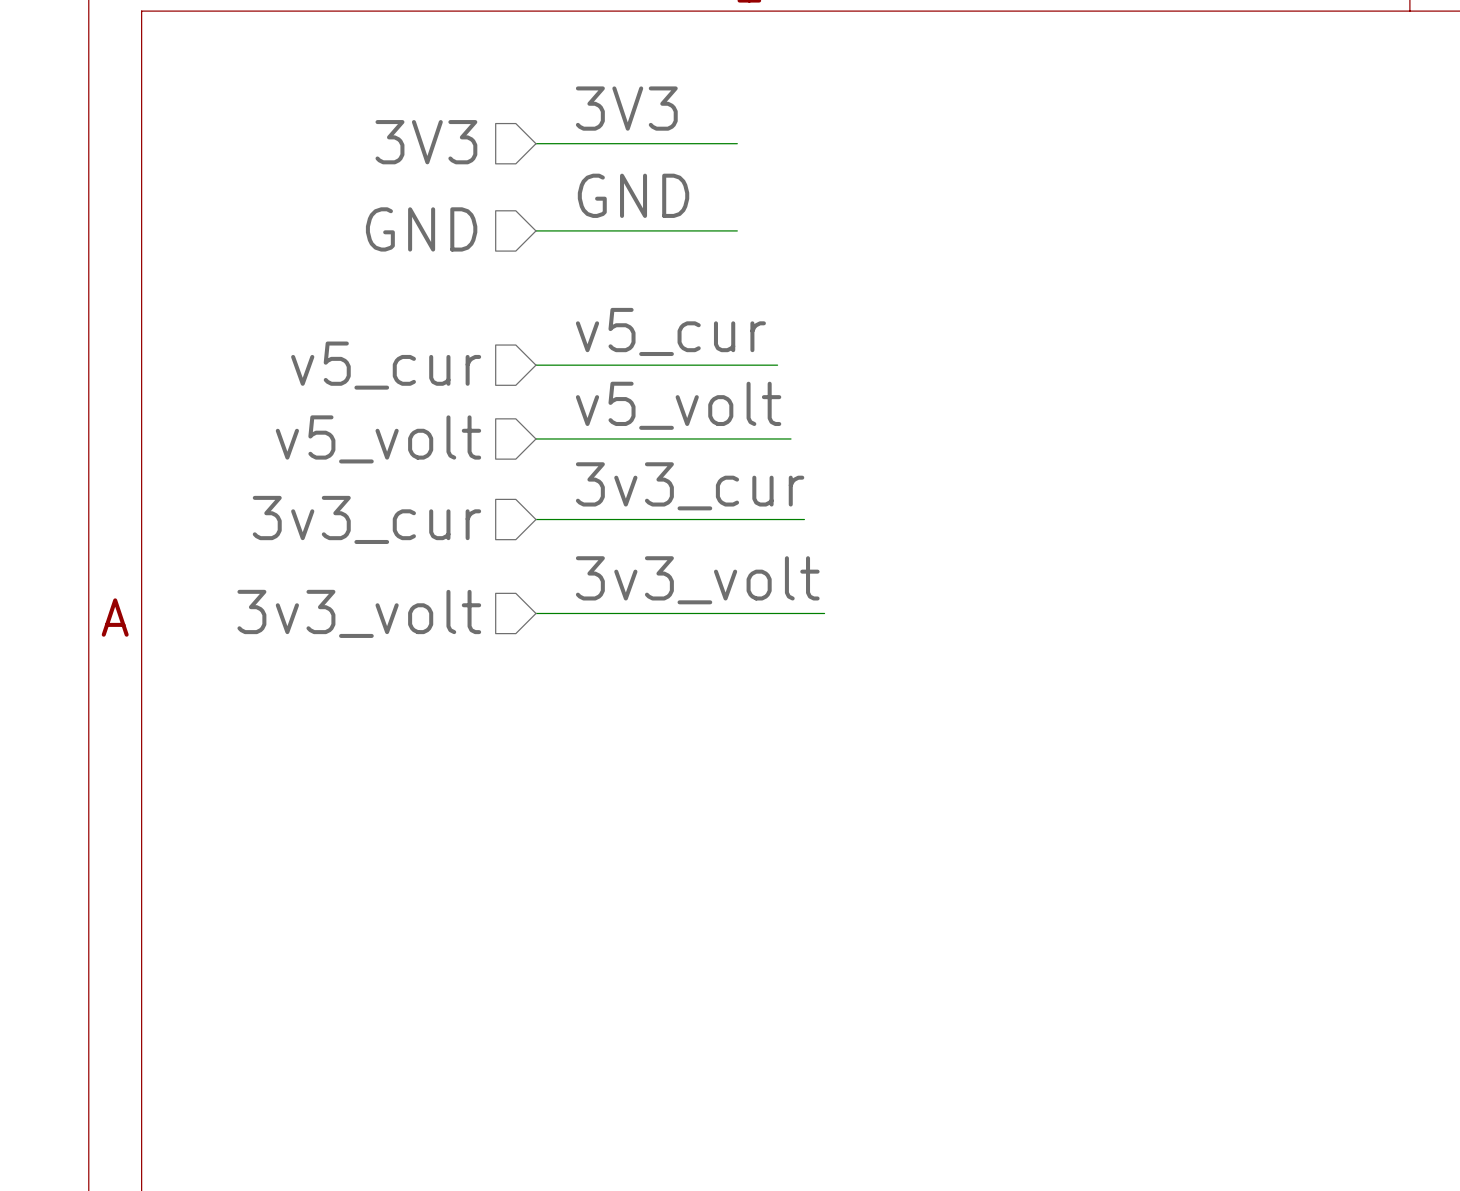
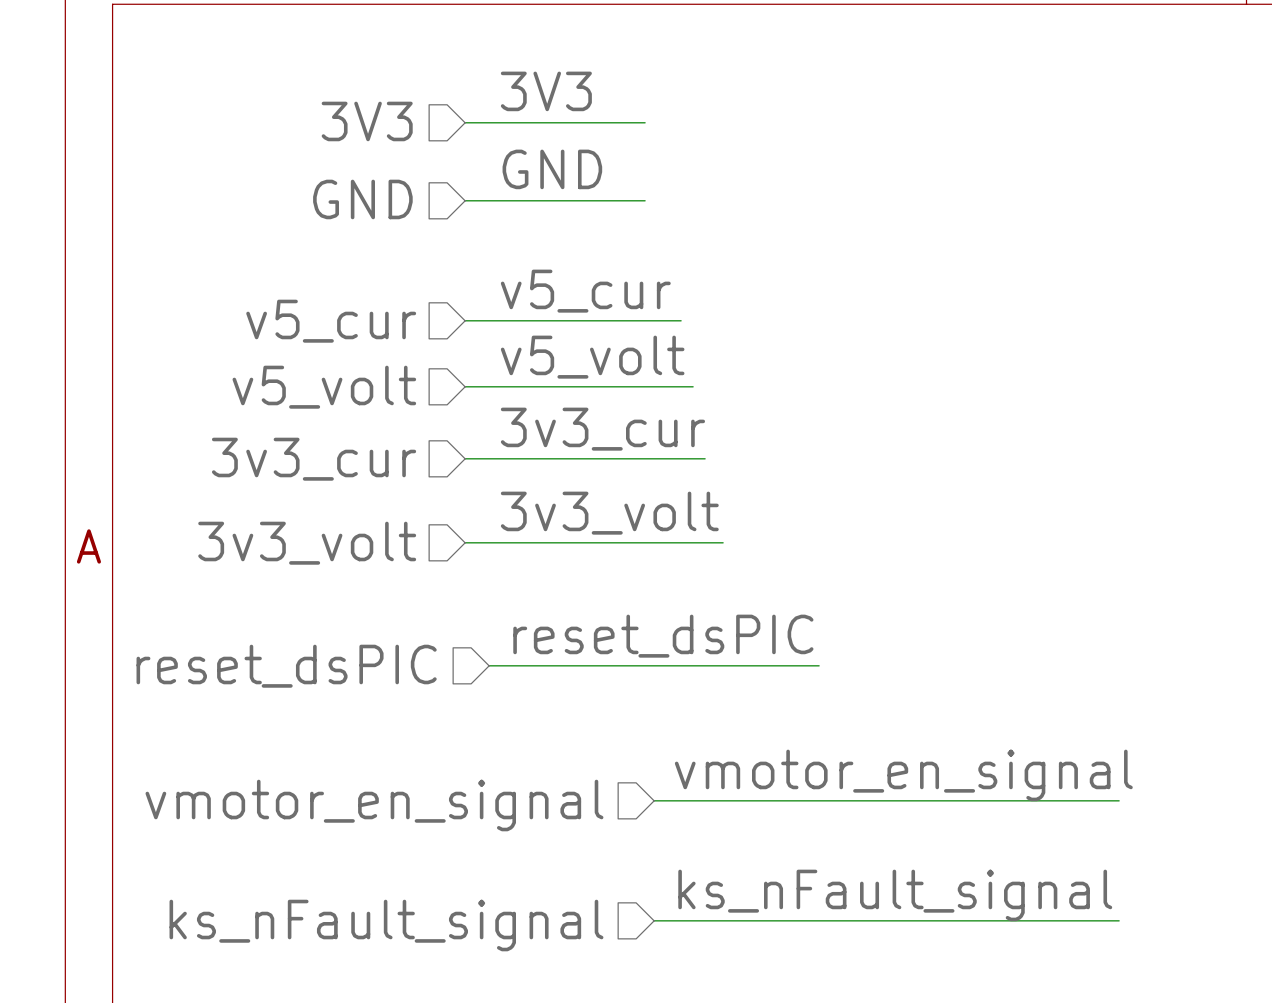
label: none -> reset_dsPIC (663, 636)
hierarchical label: none -> reset_dsPIC (286, 666)
wire: none -> (489, 665) (819, 665)
label: none -> vmotor_en_signal (903, 775)
wire: none -> (654, 800) (1119, 800)
hierarchical label: none -> vmotor_en_signal (374, 805)
label: none -> ks_nFault_signal (895, 895)
wire: none -> (654, 920) (1119, 920)
hierarchical label: none -> ks_nFault_signal (386, 925)

